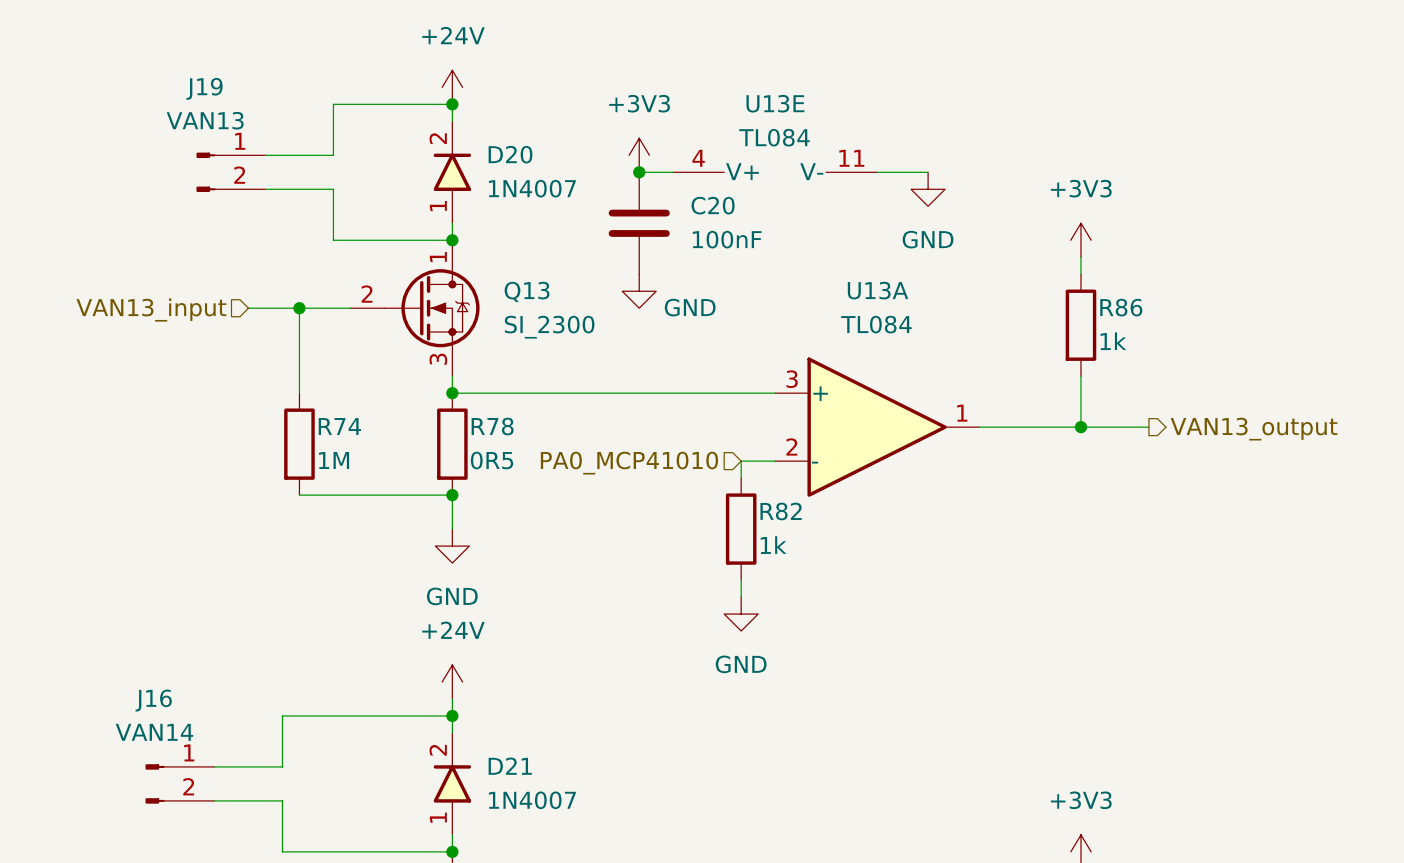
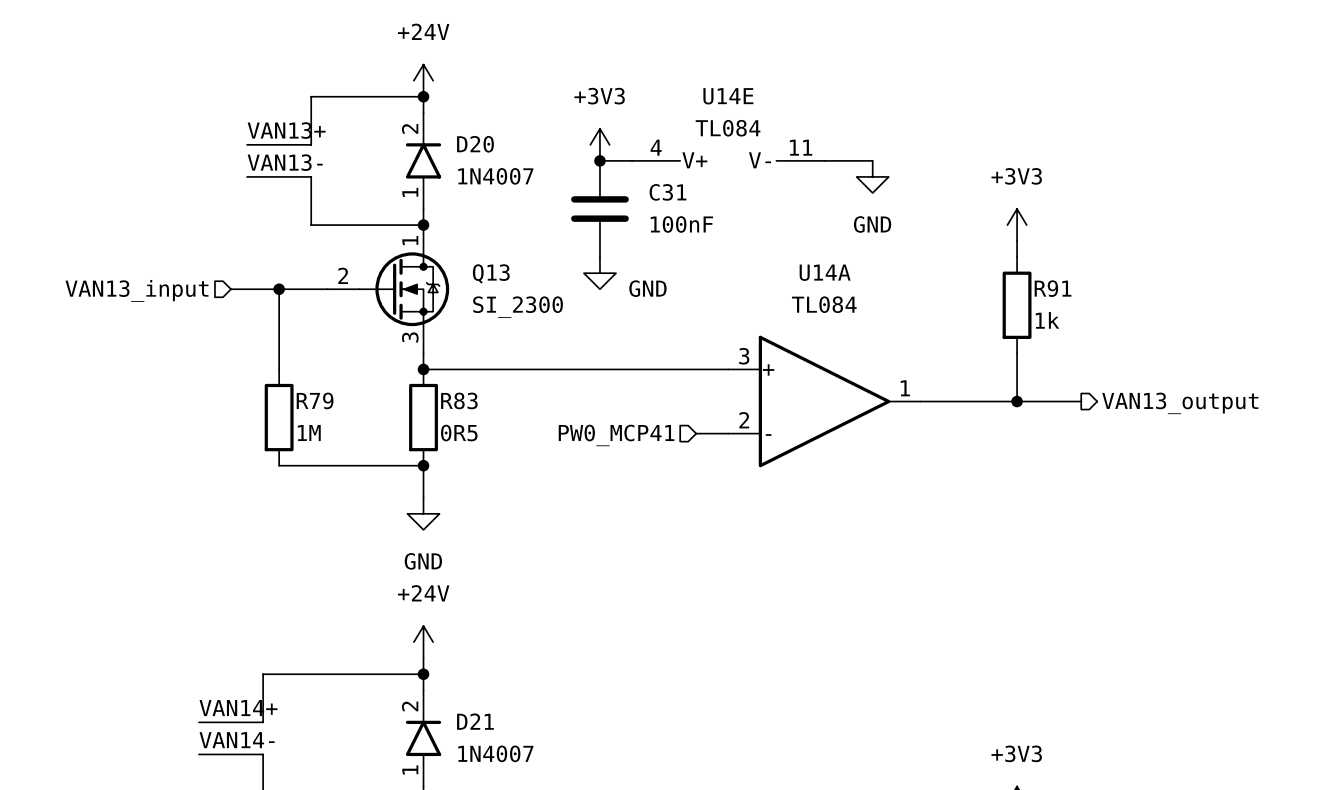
U13E name: U13E (775, 103) -> U14E (728, 96)
label: none -> VAN13+ (286, 130)
J19: VAN13 (230, 172) -> none
label: none -> VAN13- (285, 162)
C20 name: C20 (713, 205) -> C31 (667, 192)
U13A name: U13A (878, 290) -> U14A (825, 272)
R86 name: R86 (1121, 307) -> R91 (1053, 288)
R74 name: R74 (339, 426) -> R79 (315, 400)
R78 name: R78 (492, 426) -> R83 (459, 400)
wire: (741, 461) (741, 478) -> none
hierarchical label: PA0_MCP41010 (629, 463) -> PW0_MCP41 (616, 435)
R82: 1k (741, 529) -> none
wire: (741, 580) (741, 597) -> none
power symbol: GND (741, 614) -> none
label: none -> VAN14+ (238, 708)
J16: VAN14 (180, 783) -> none
label: none -> VAN14- (237, 740)

